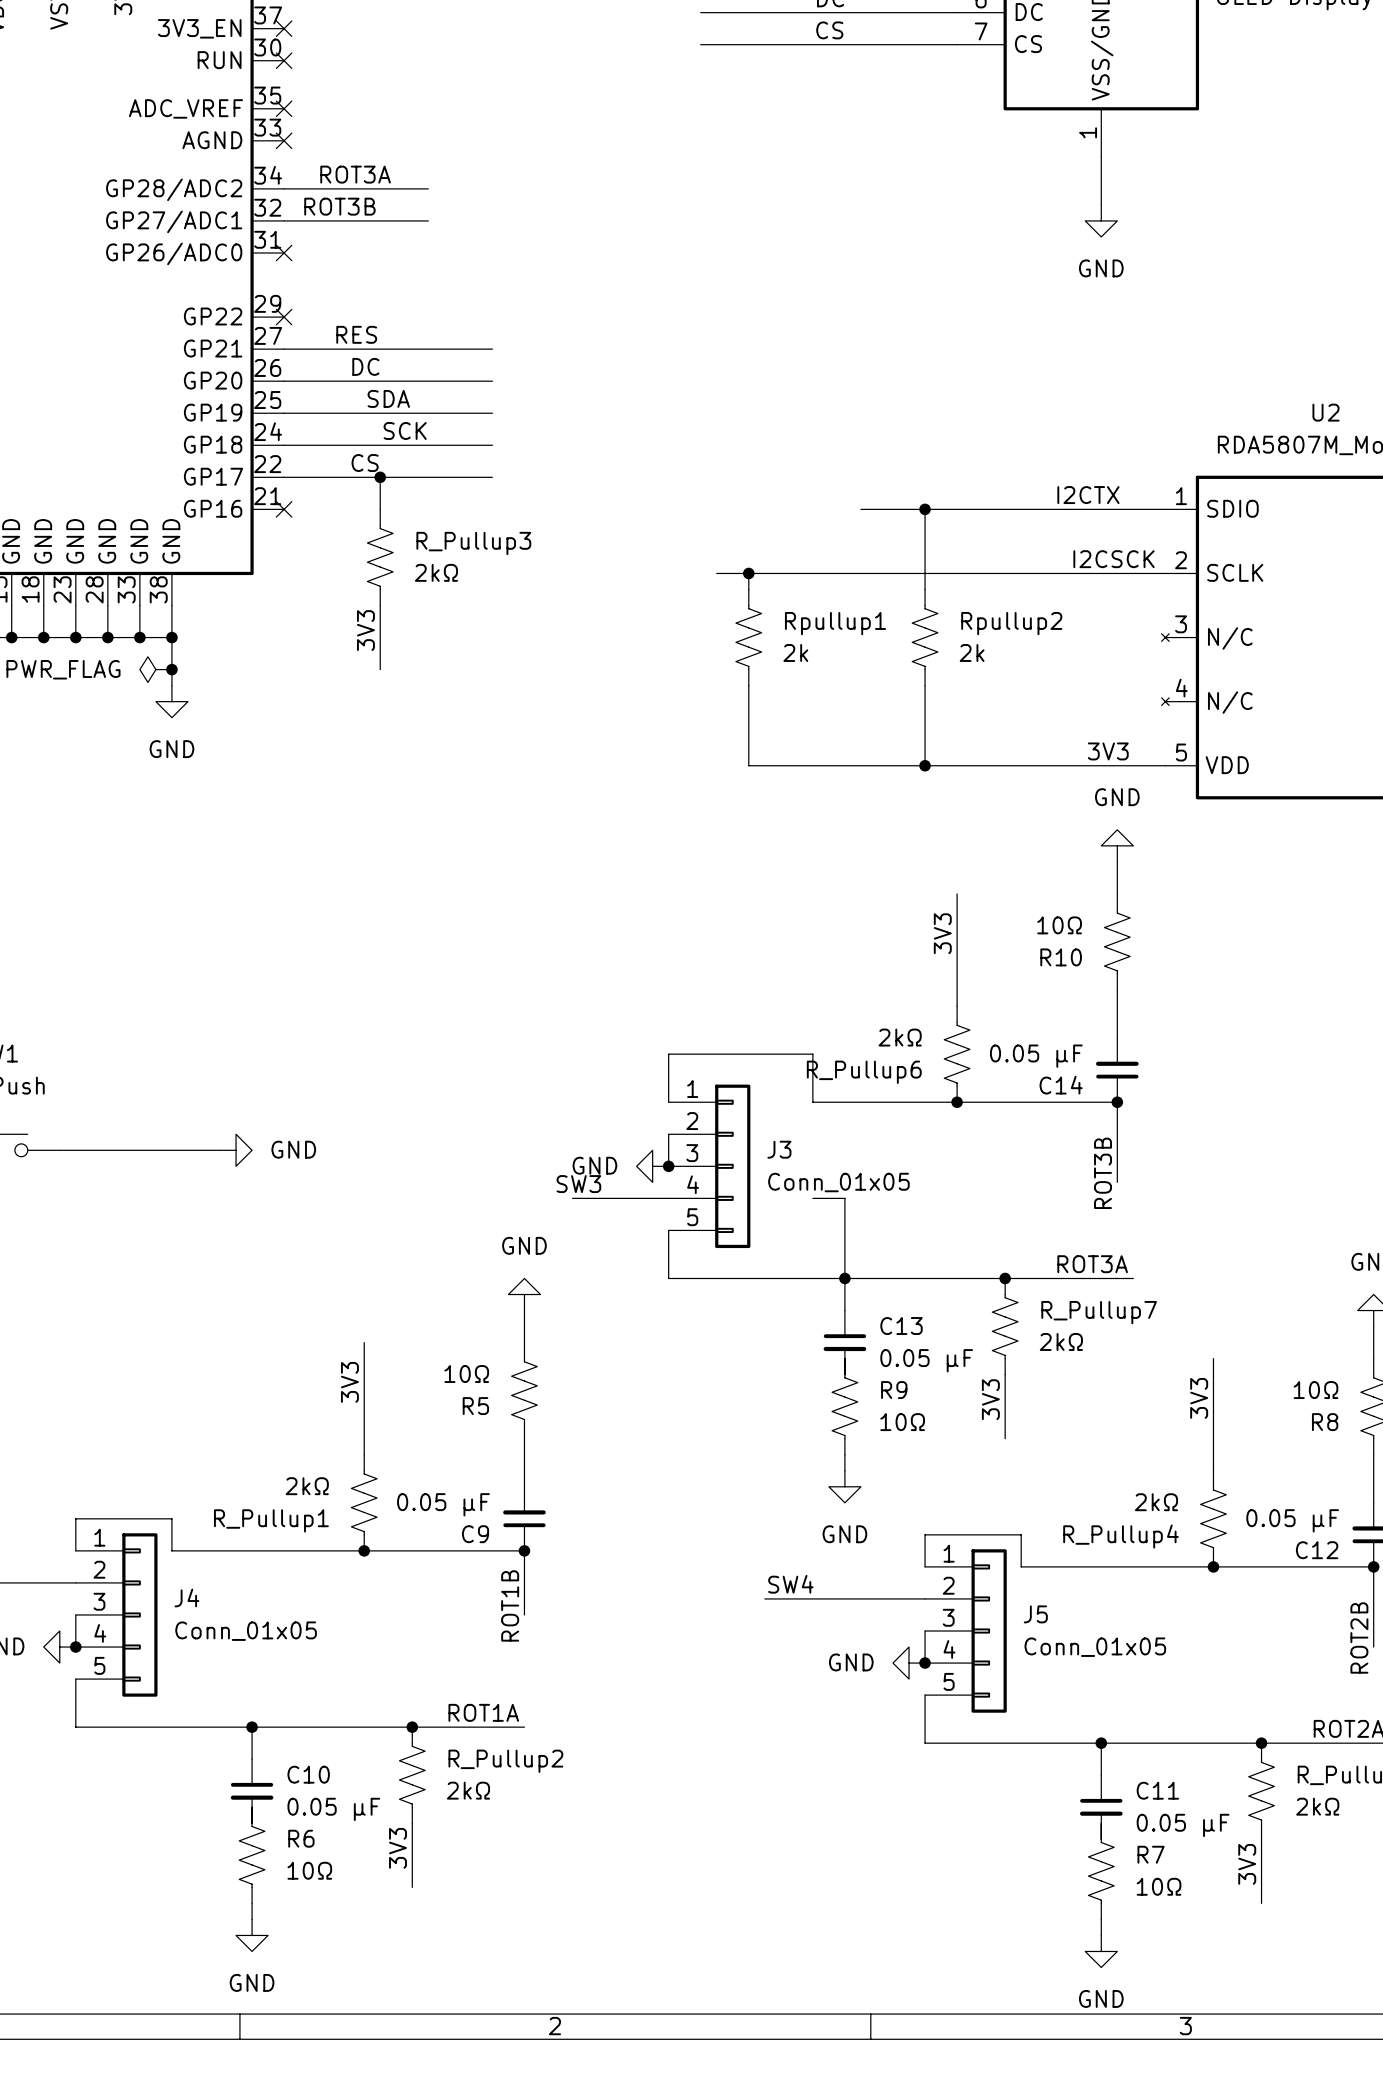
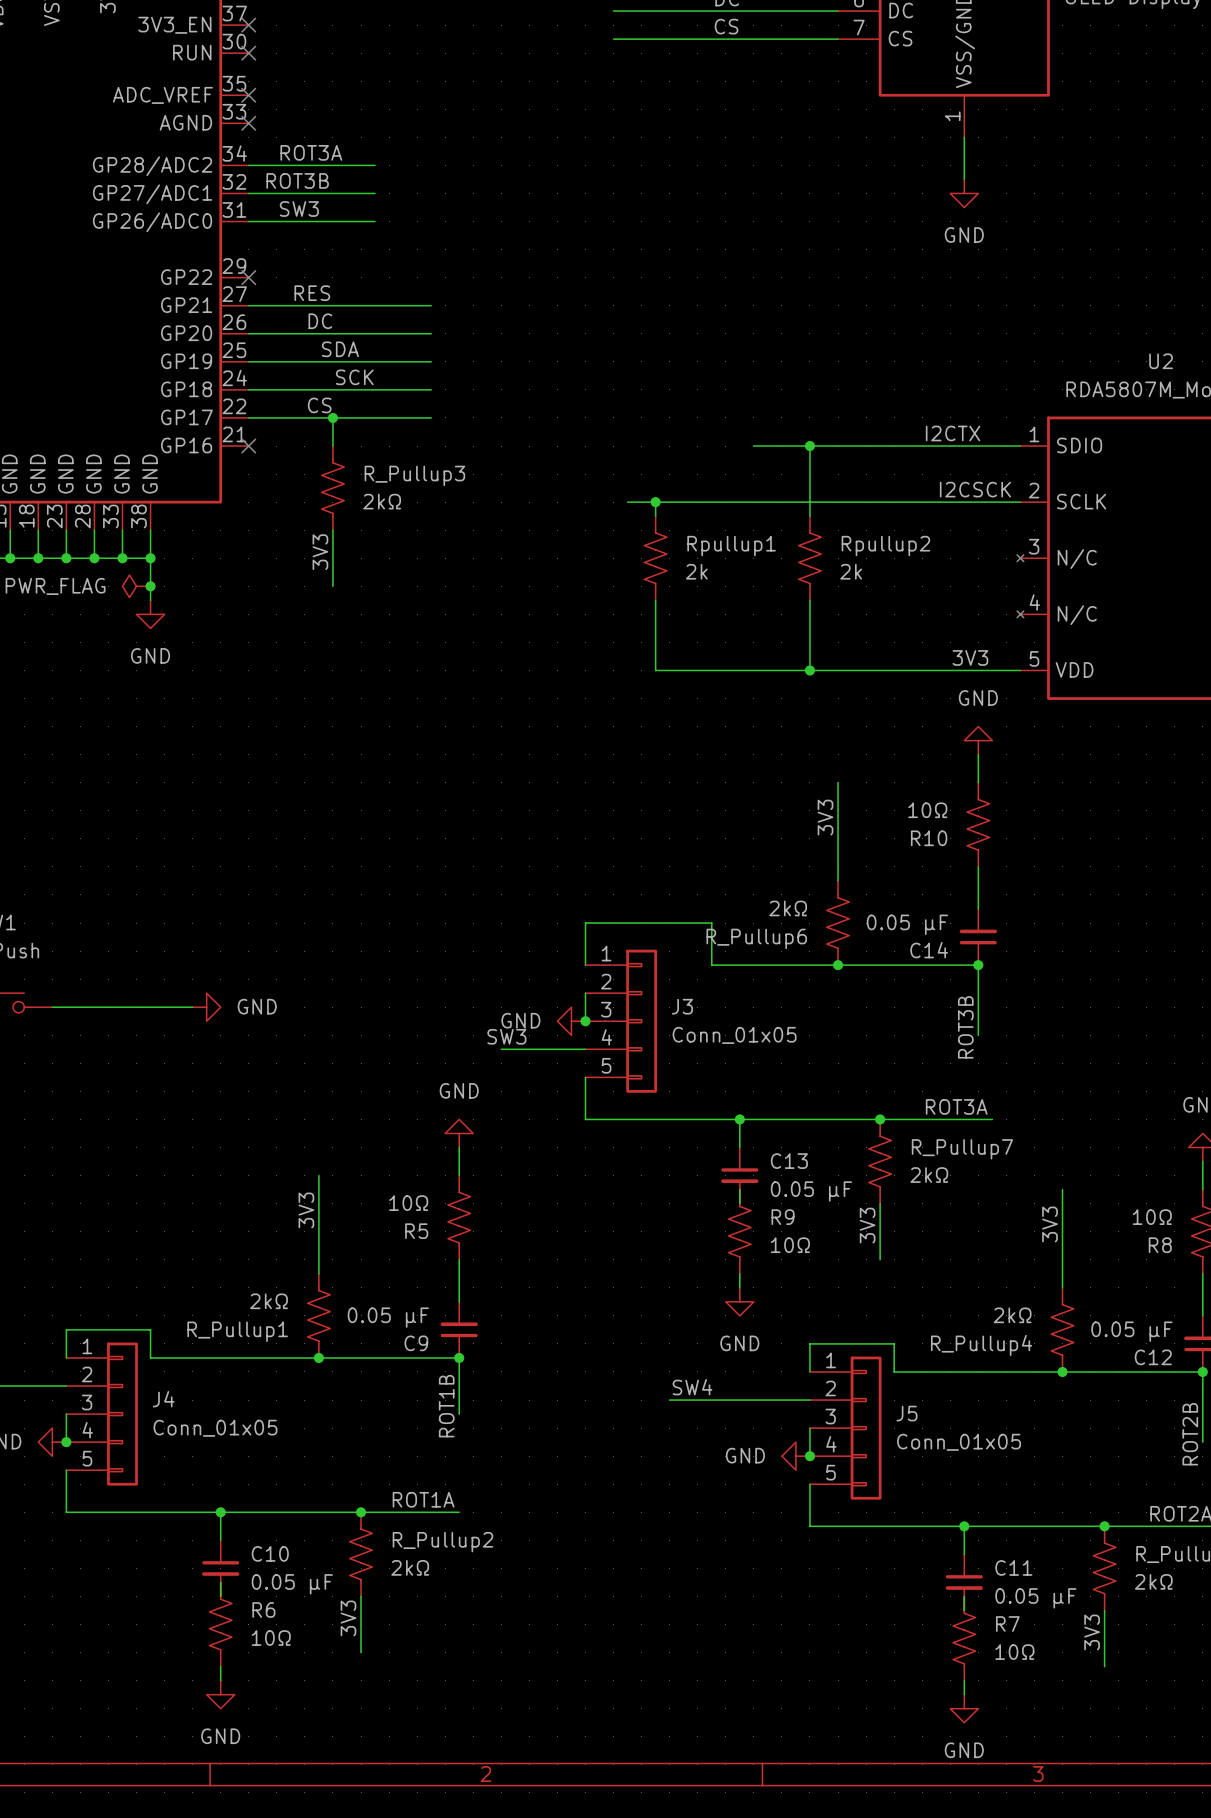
label: none -> SW3 (299, 209)
wire: none -> (248, 221) (375, 221)
no-connect mark: (284, 252) -> none
wire: (812, 1198) (844, 1198) (844, 1278) -> none

